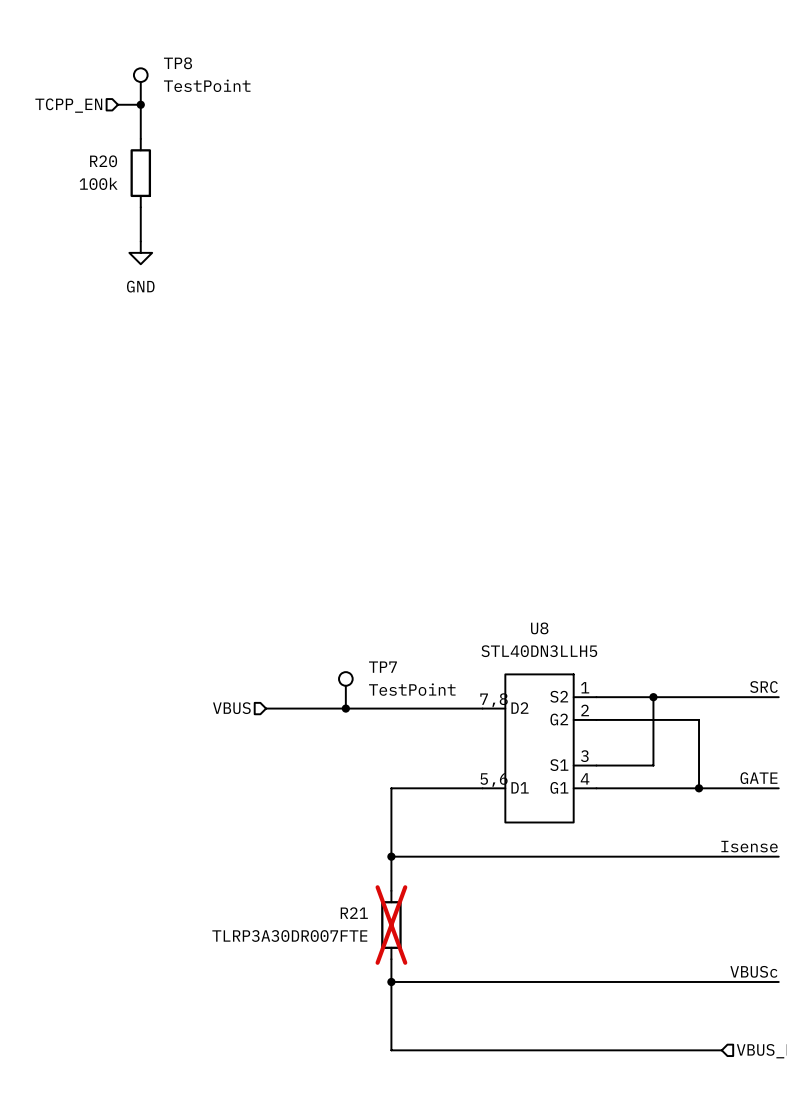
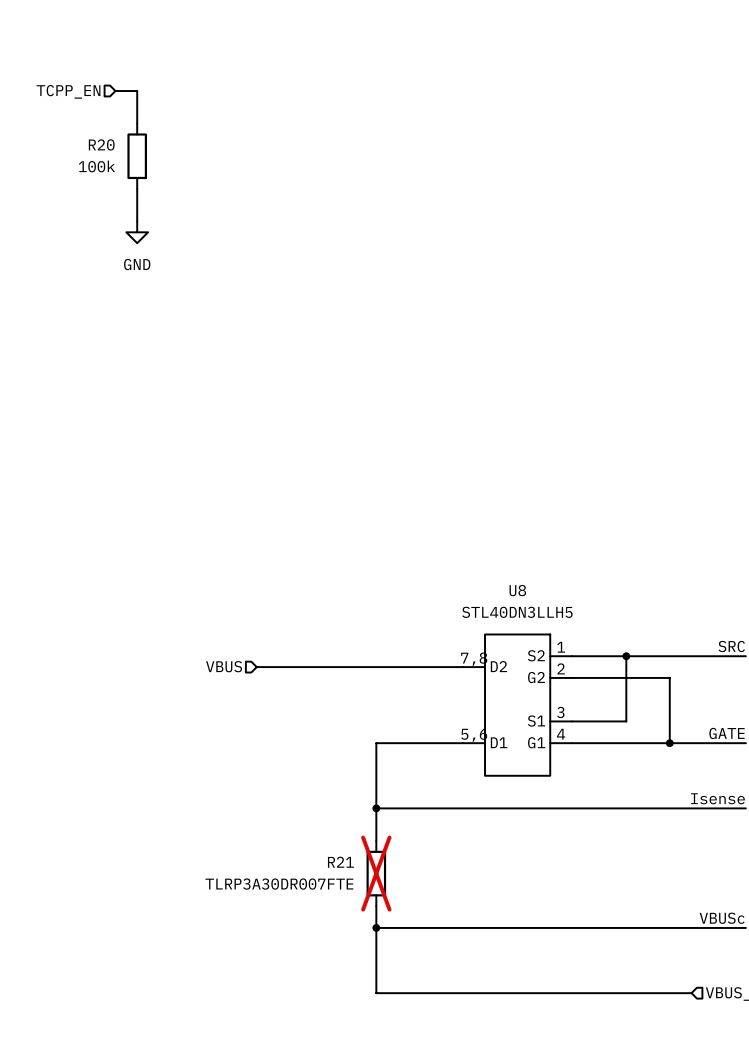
TP8: TestPoint (140, 86) -> none
junction: (140, 104) -> none
TP7: TestPoint (345, 690) -> none
junction: (345, 708) -> none

